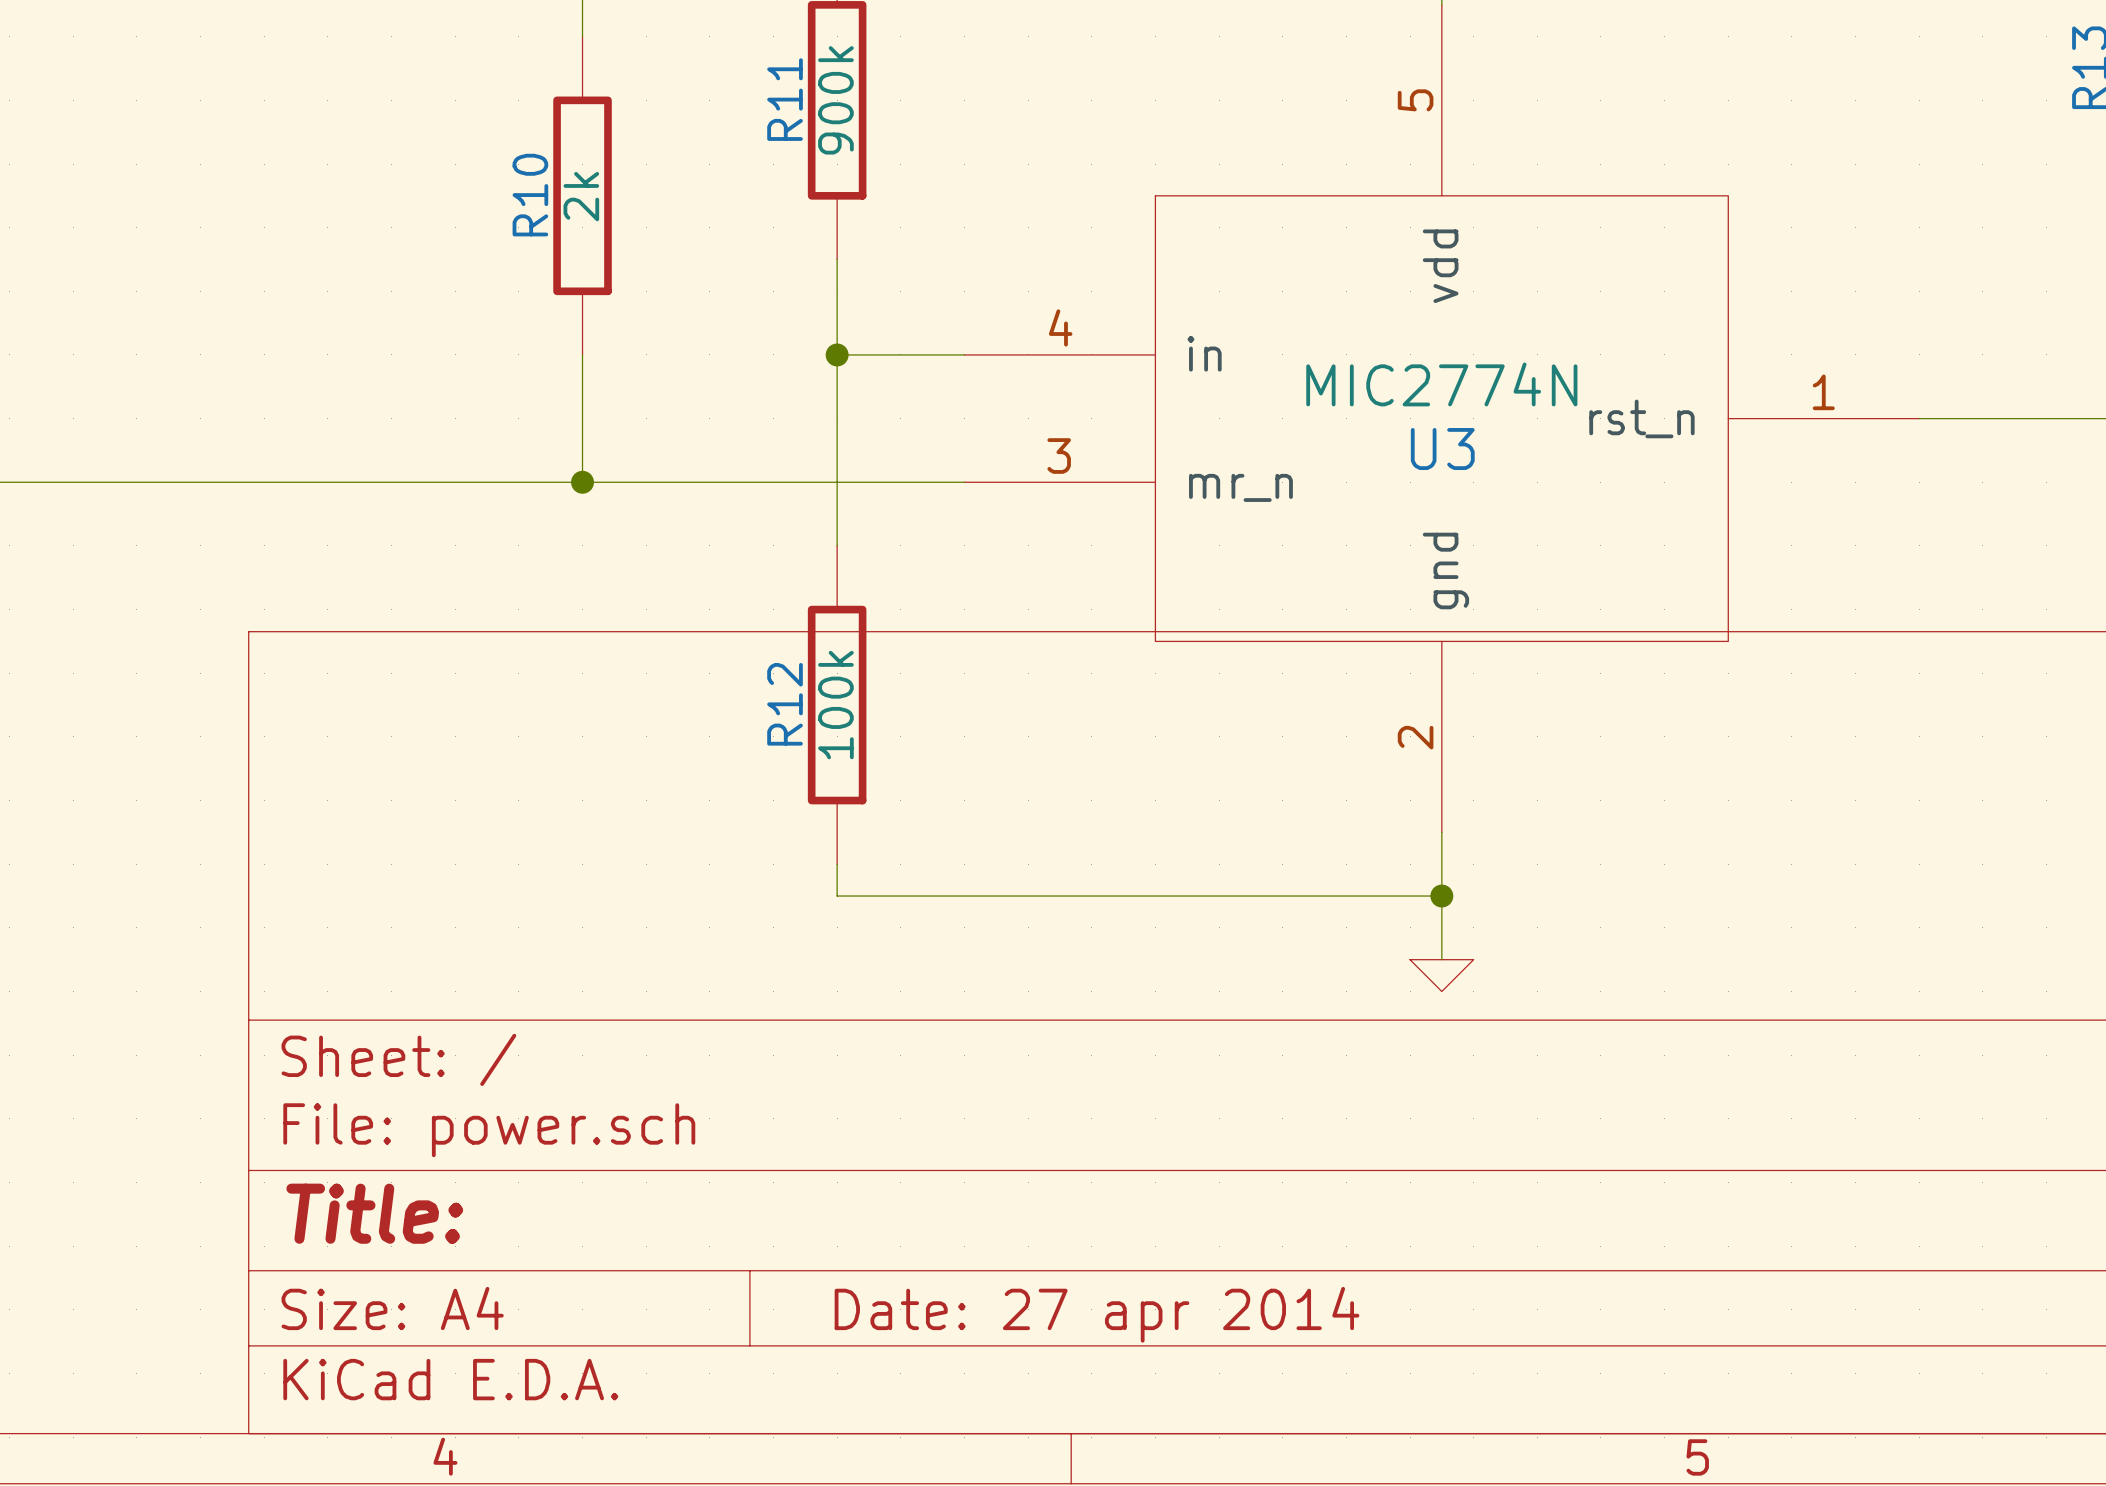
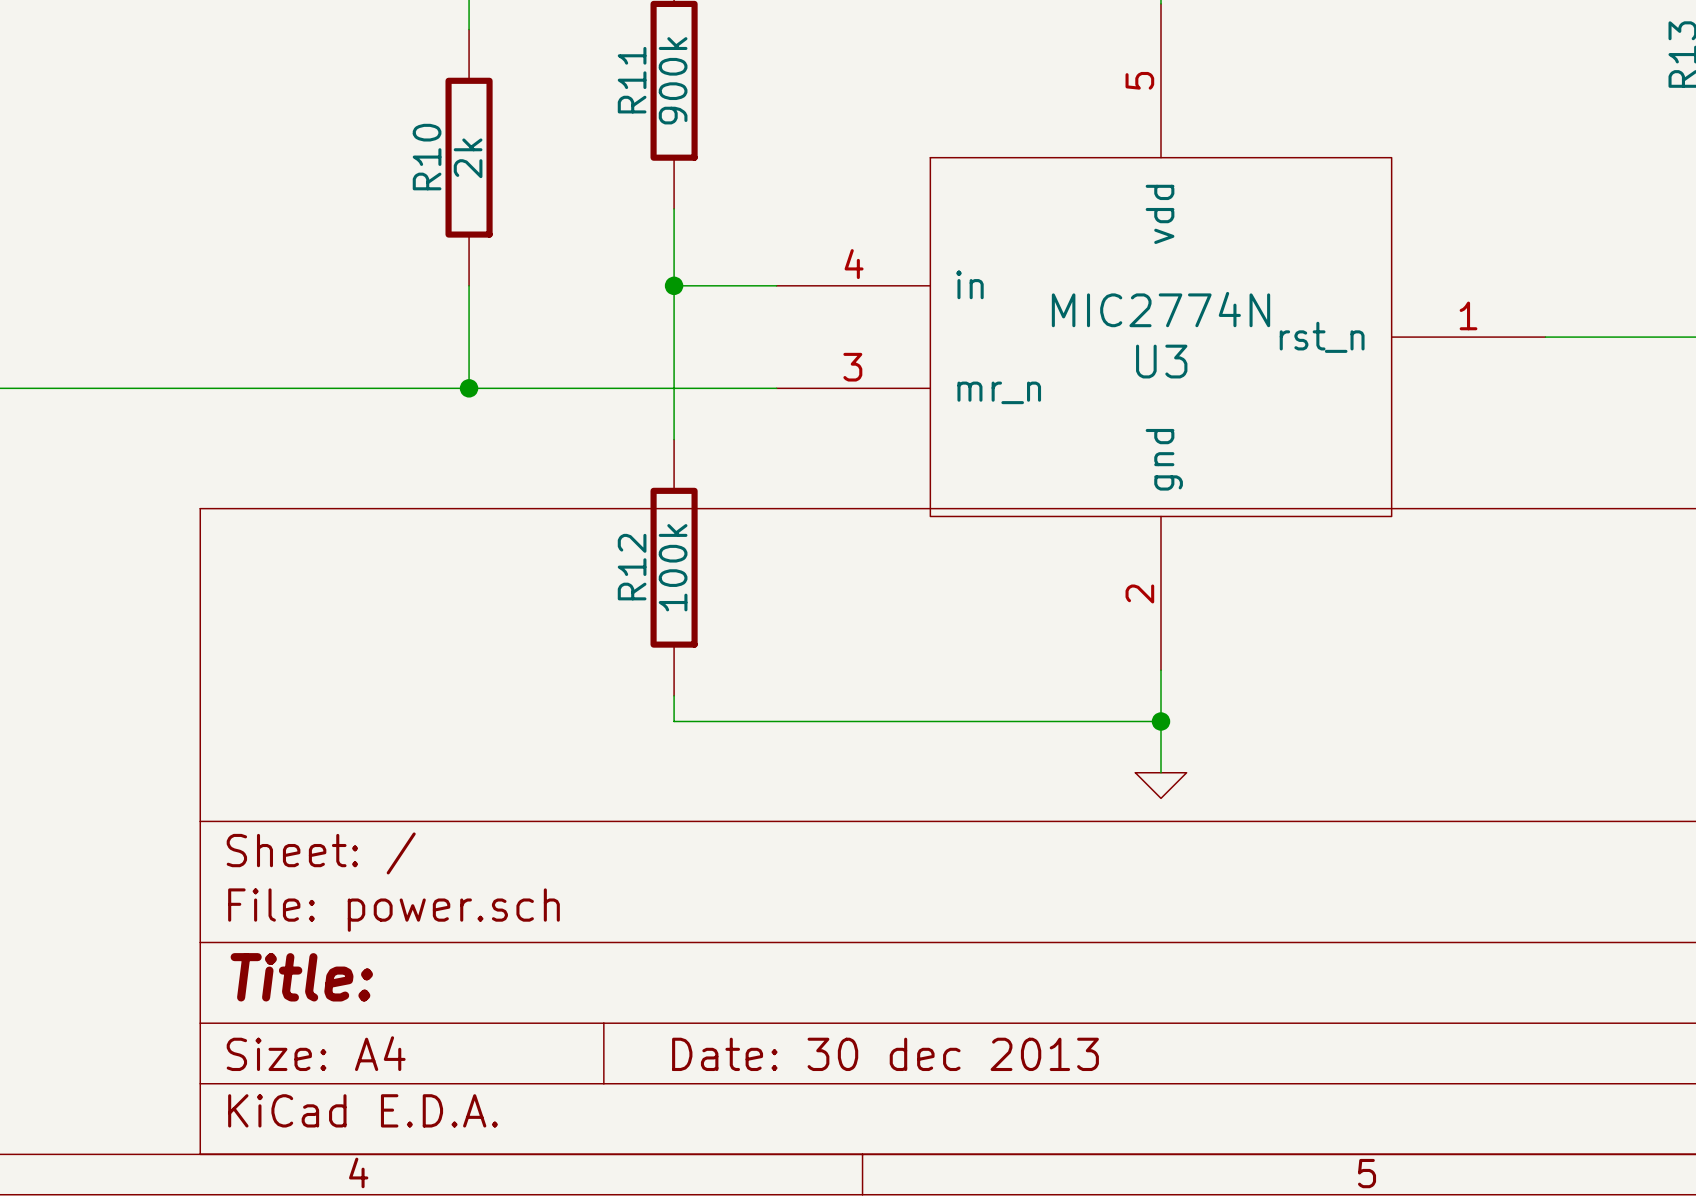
title block: Date: 27 apr 2014 (1097, 1314) -> Date: 30 dec 2013 (885, 1054)

